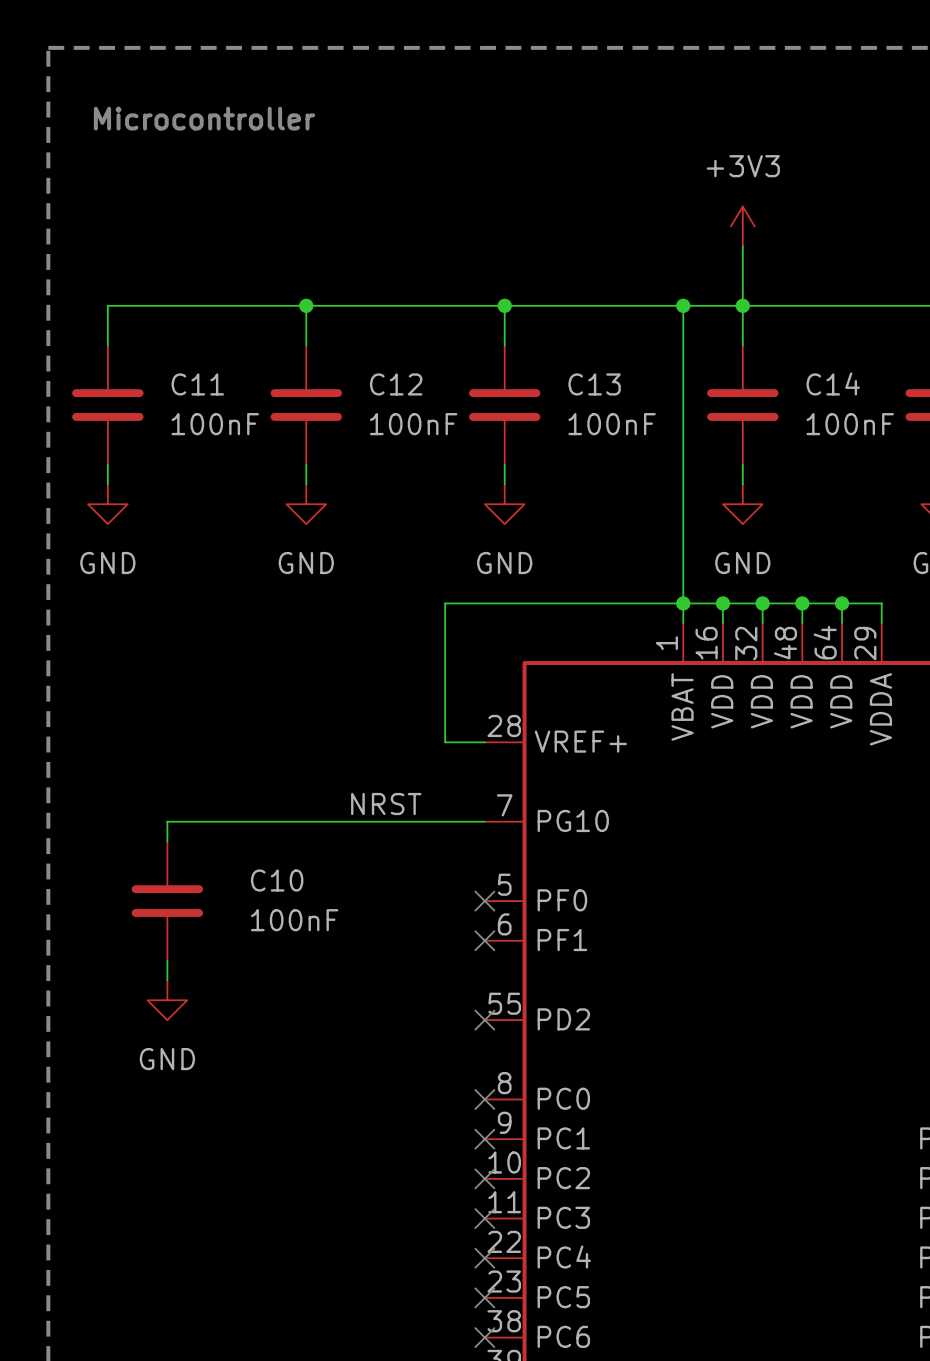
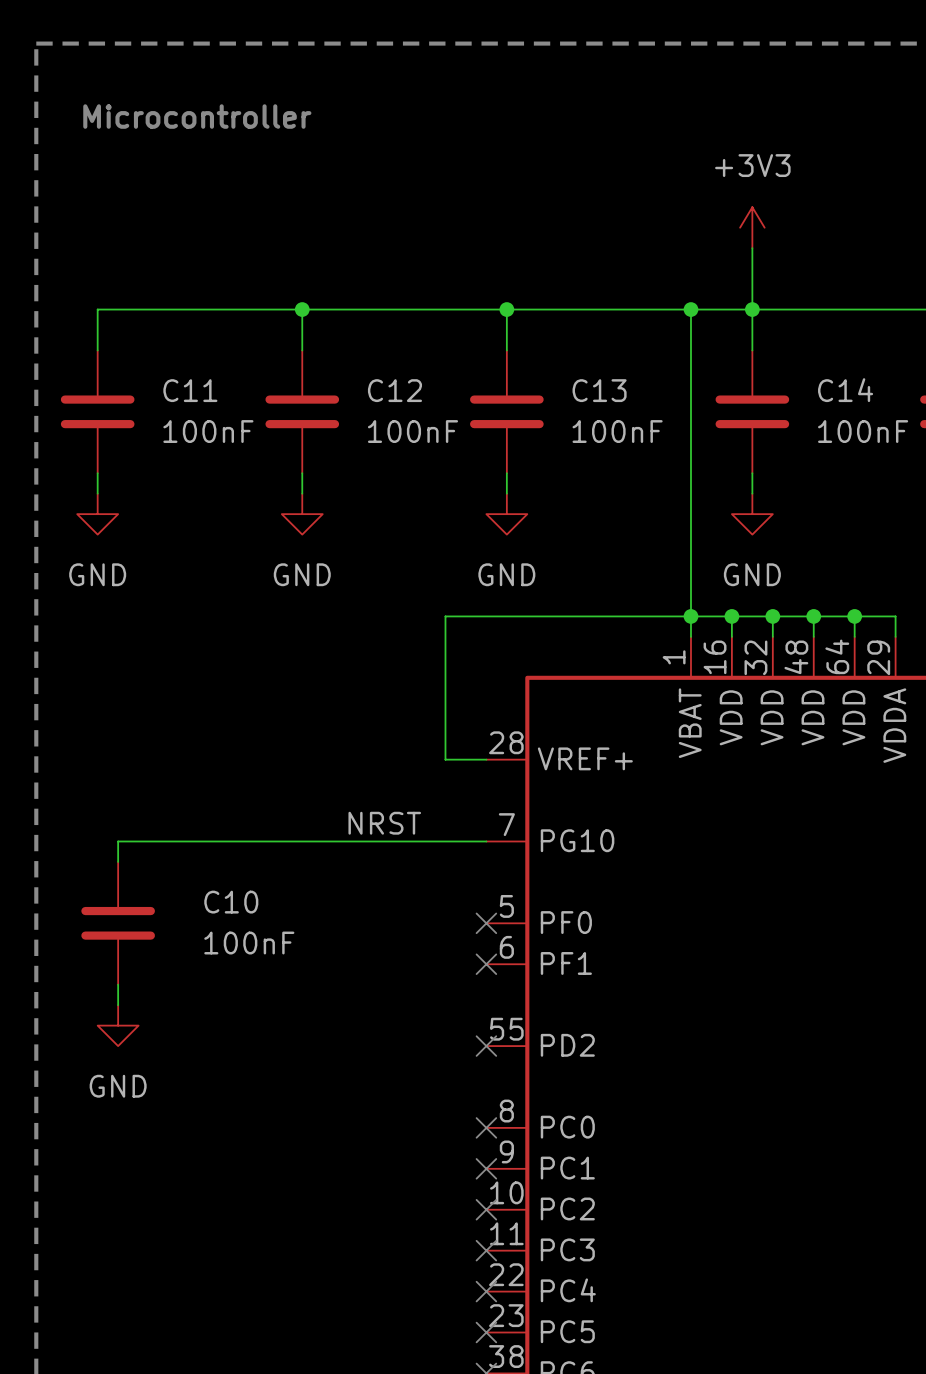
wire: (167, 821) (167, 841) -> (159, 841) (118, 841) (118, 861)
C10 position: (167, 901) -> (118, 923)
wire: (167, 960) (167, 980) -> (118, 984) (118, 1005)
power symbol position: GND (167, 1000) -> GND (118, 1025)

